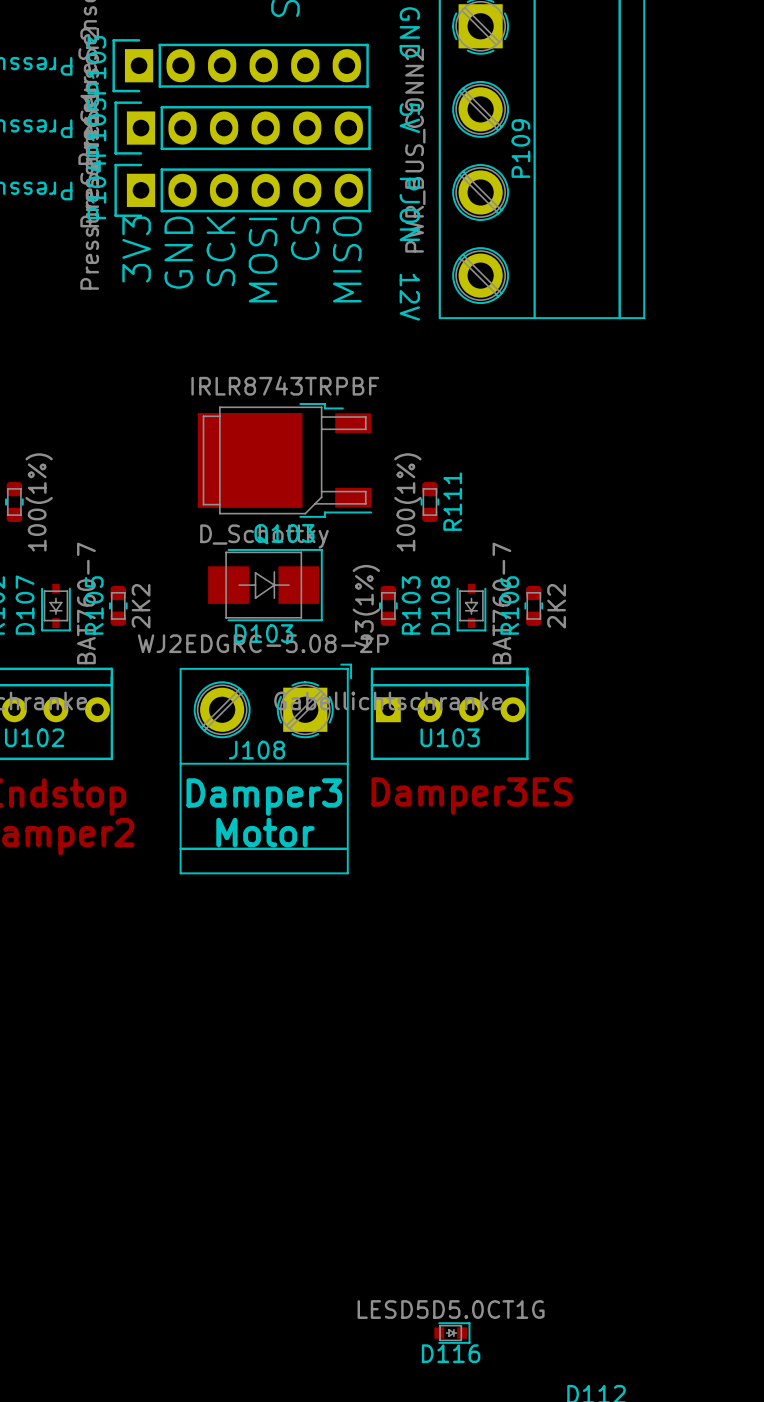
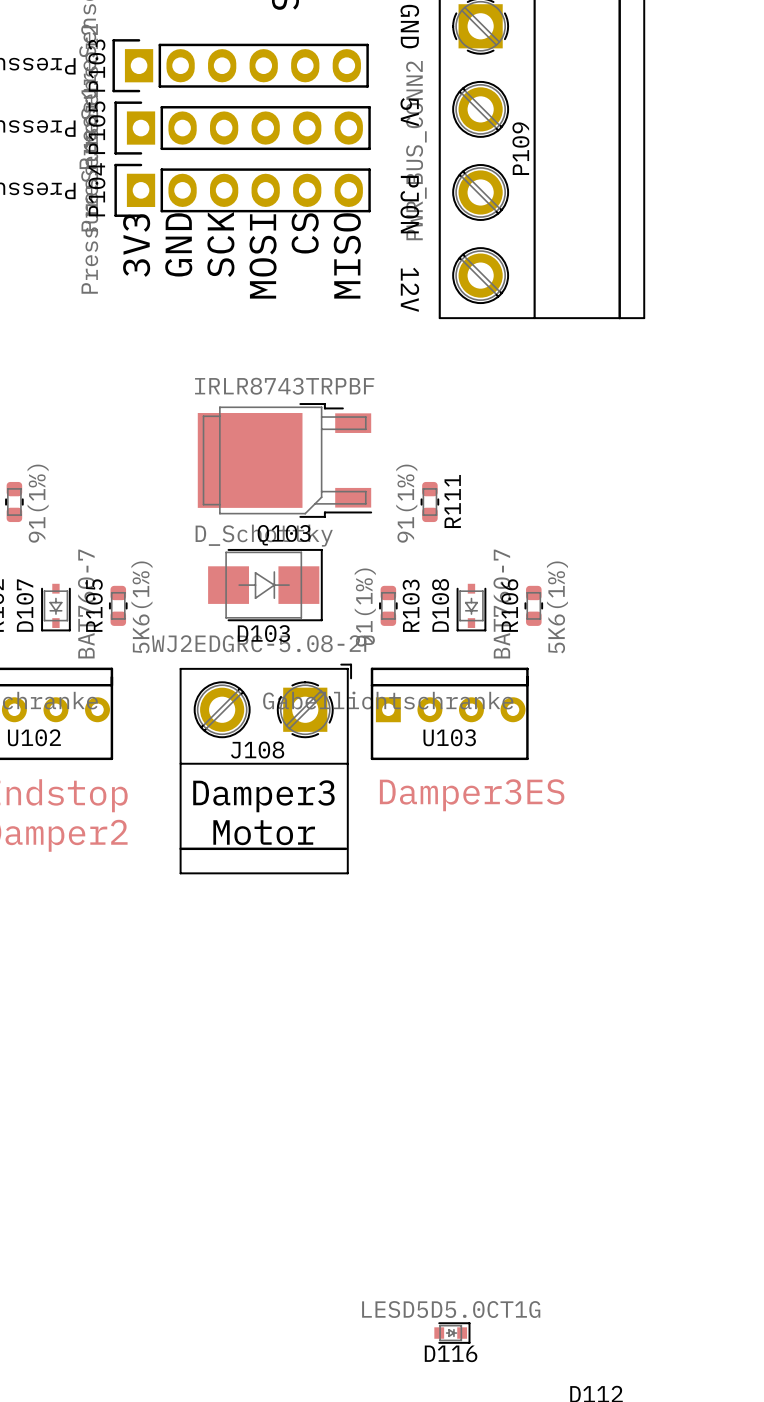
part value: 100(1%) (39, 502) -> 91(1%) (38, 503)
R111 value: 100(1%) (407, 502) -> 91(1%) (406, 503)
R105 value: 2K2 (141, 606) -> 5K6(1%) (141, 607)
R103 value: 43(1%) (366, 606) -> 91(1%) (365, 607)
R106 value: 2K2 (556, 606) -> 5K6(1%) (557, 607)

